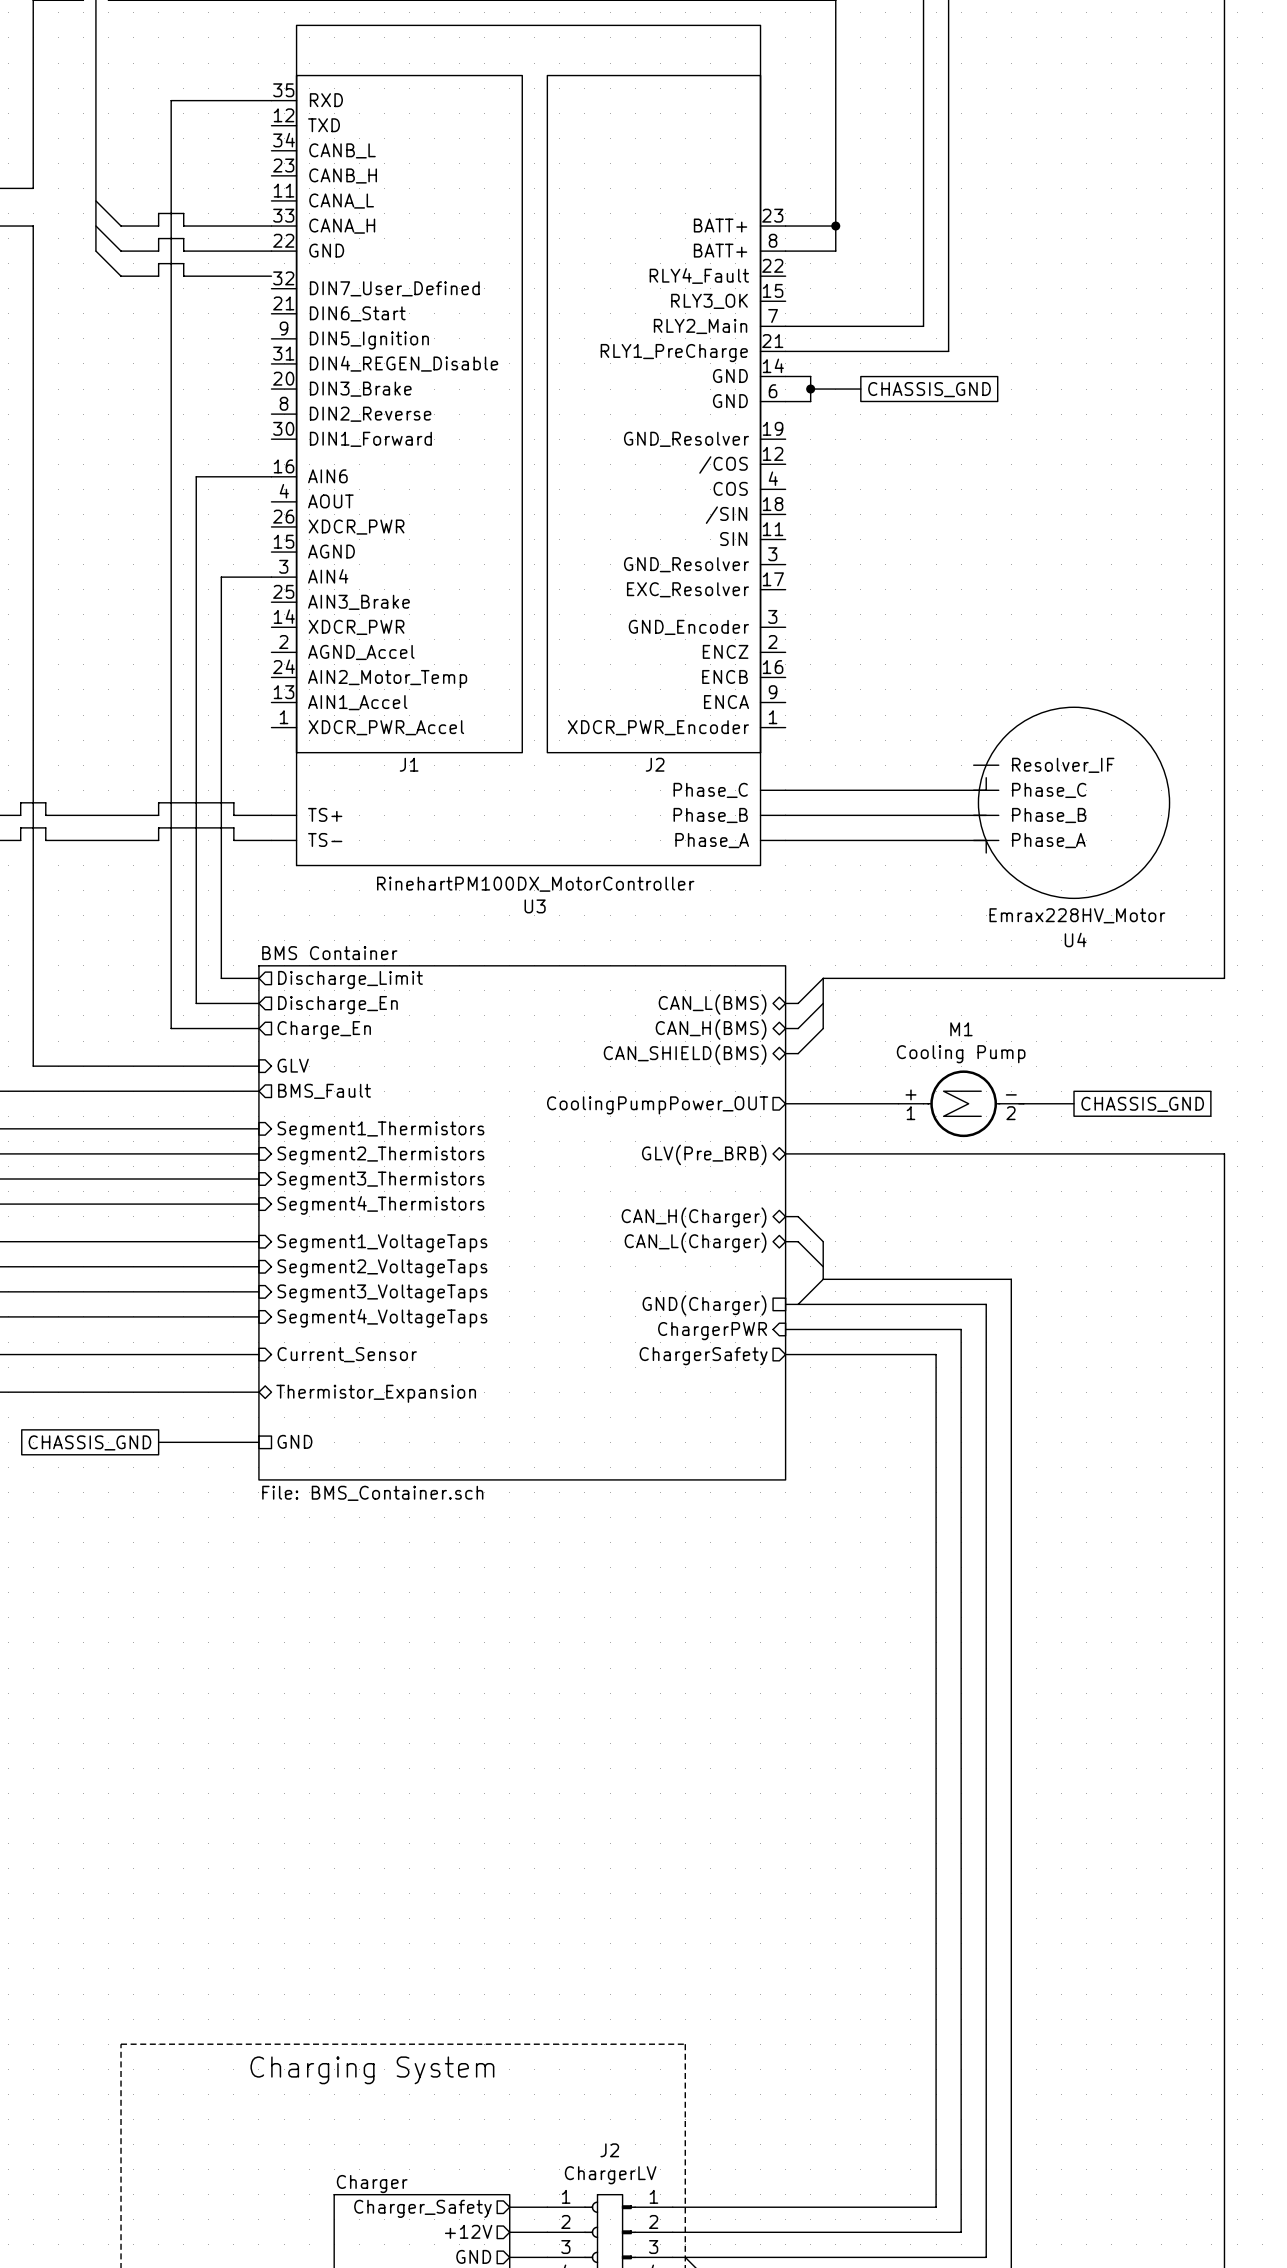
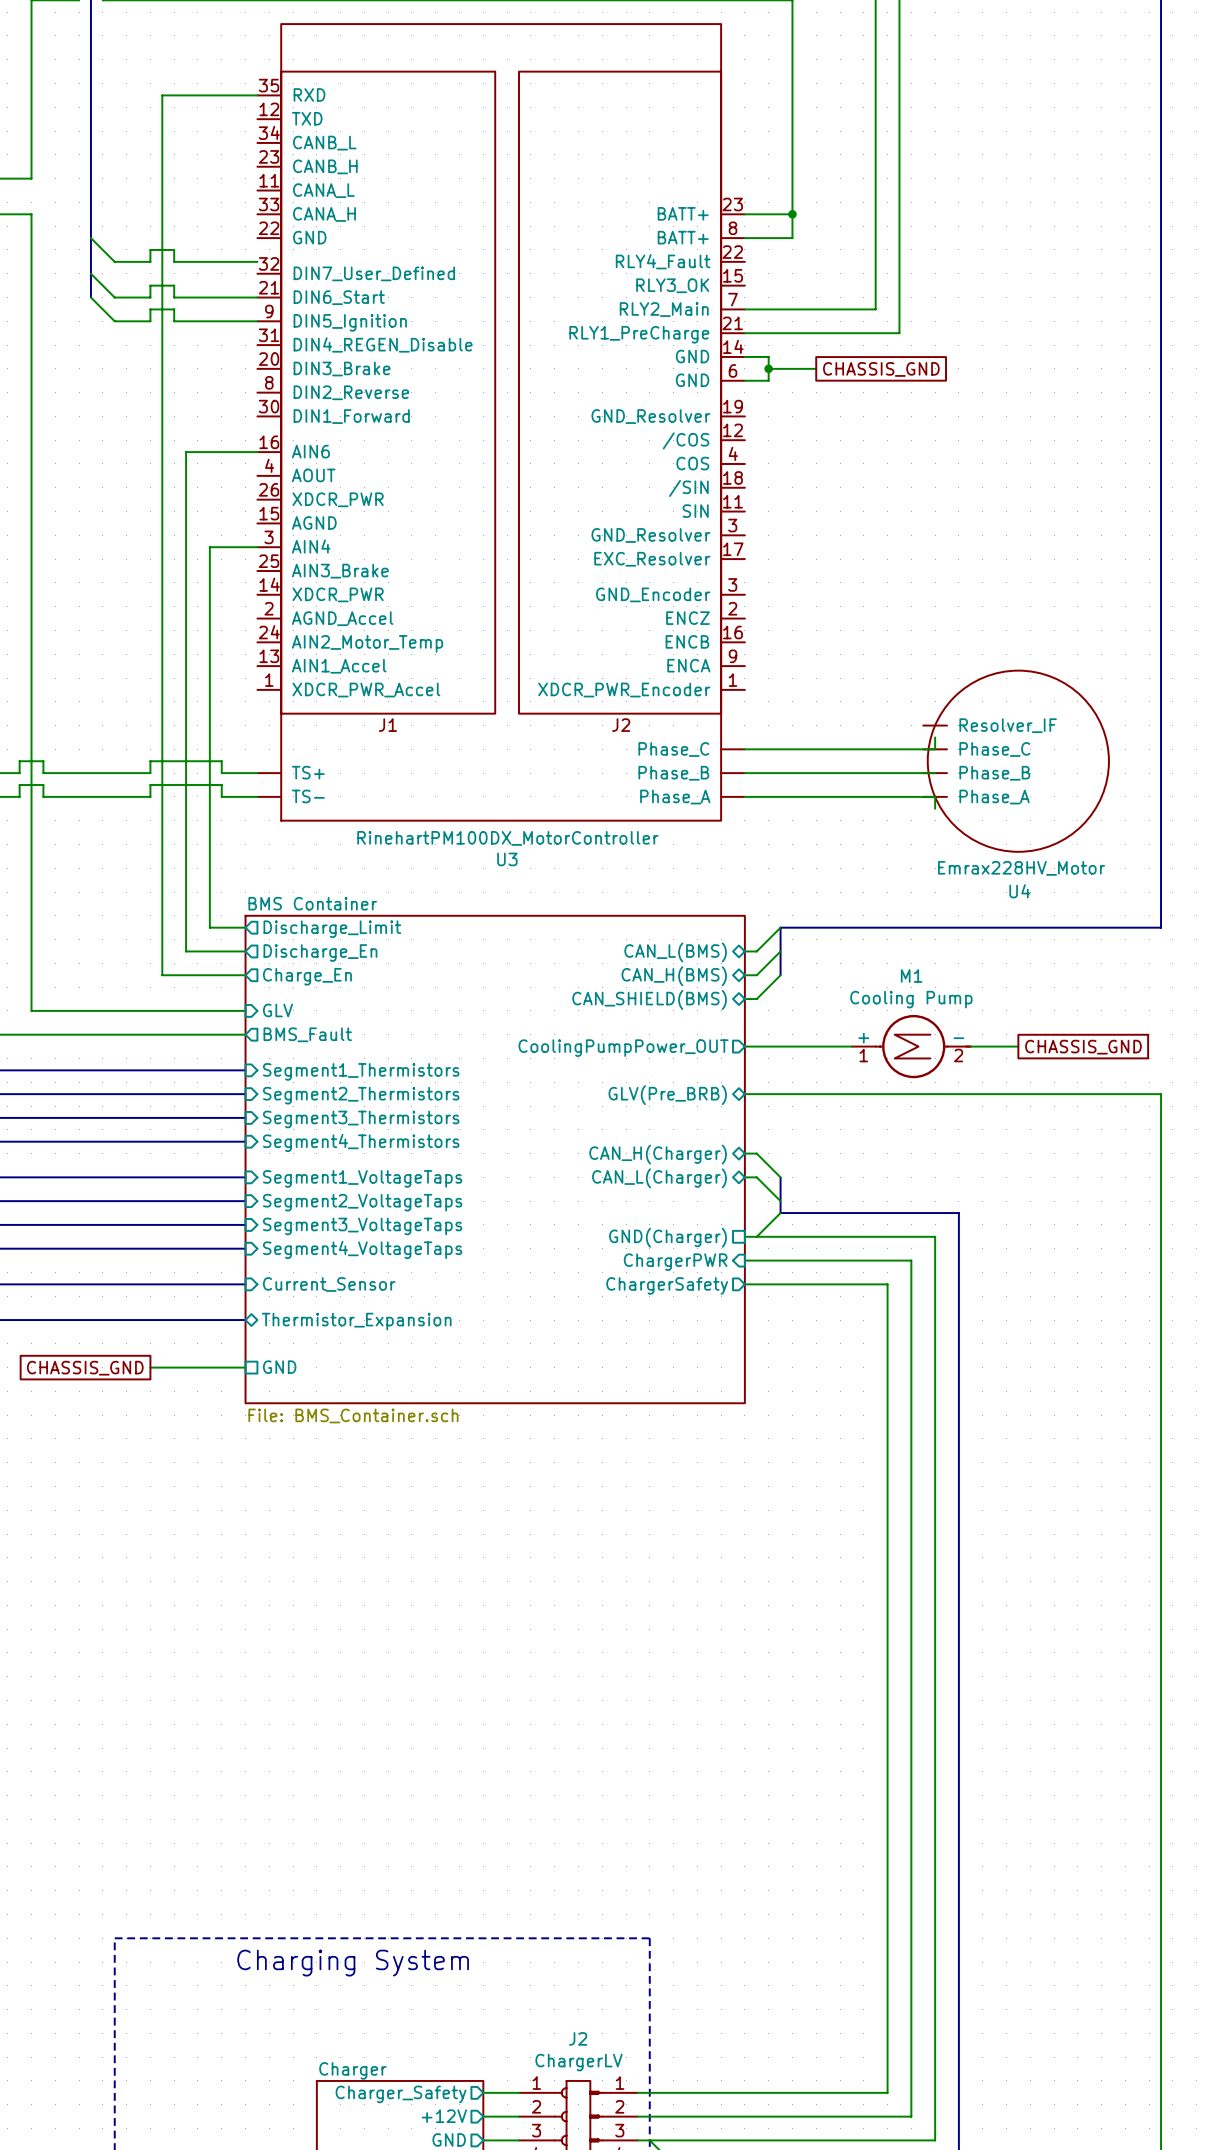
wire: (95, 200) (121, 226) (158, 226) (158, 213) (183, 213) (183, 226) (271, 226) -> (90, 273) (114, 297) (150, 297) (150, 285) (174, 285) (174, 297) (257, 297)
wire: (95, 226) (121, 251) (158, 251) (158, 238) (183, 238) (183, 251) (271, 251) -> (90, 297) (114, 321) (150, 321) (150, 309) (174, 309) (174, 321) (257, 321)
bus: none -> (90, 238) (90, 297)

